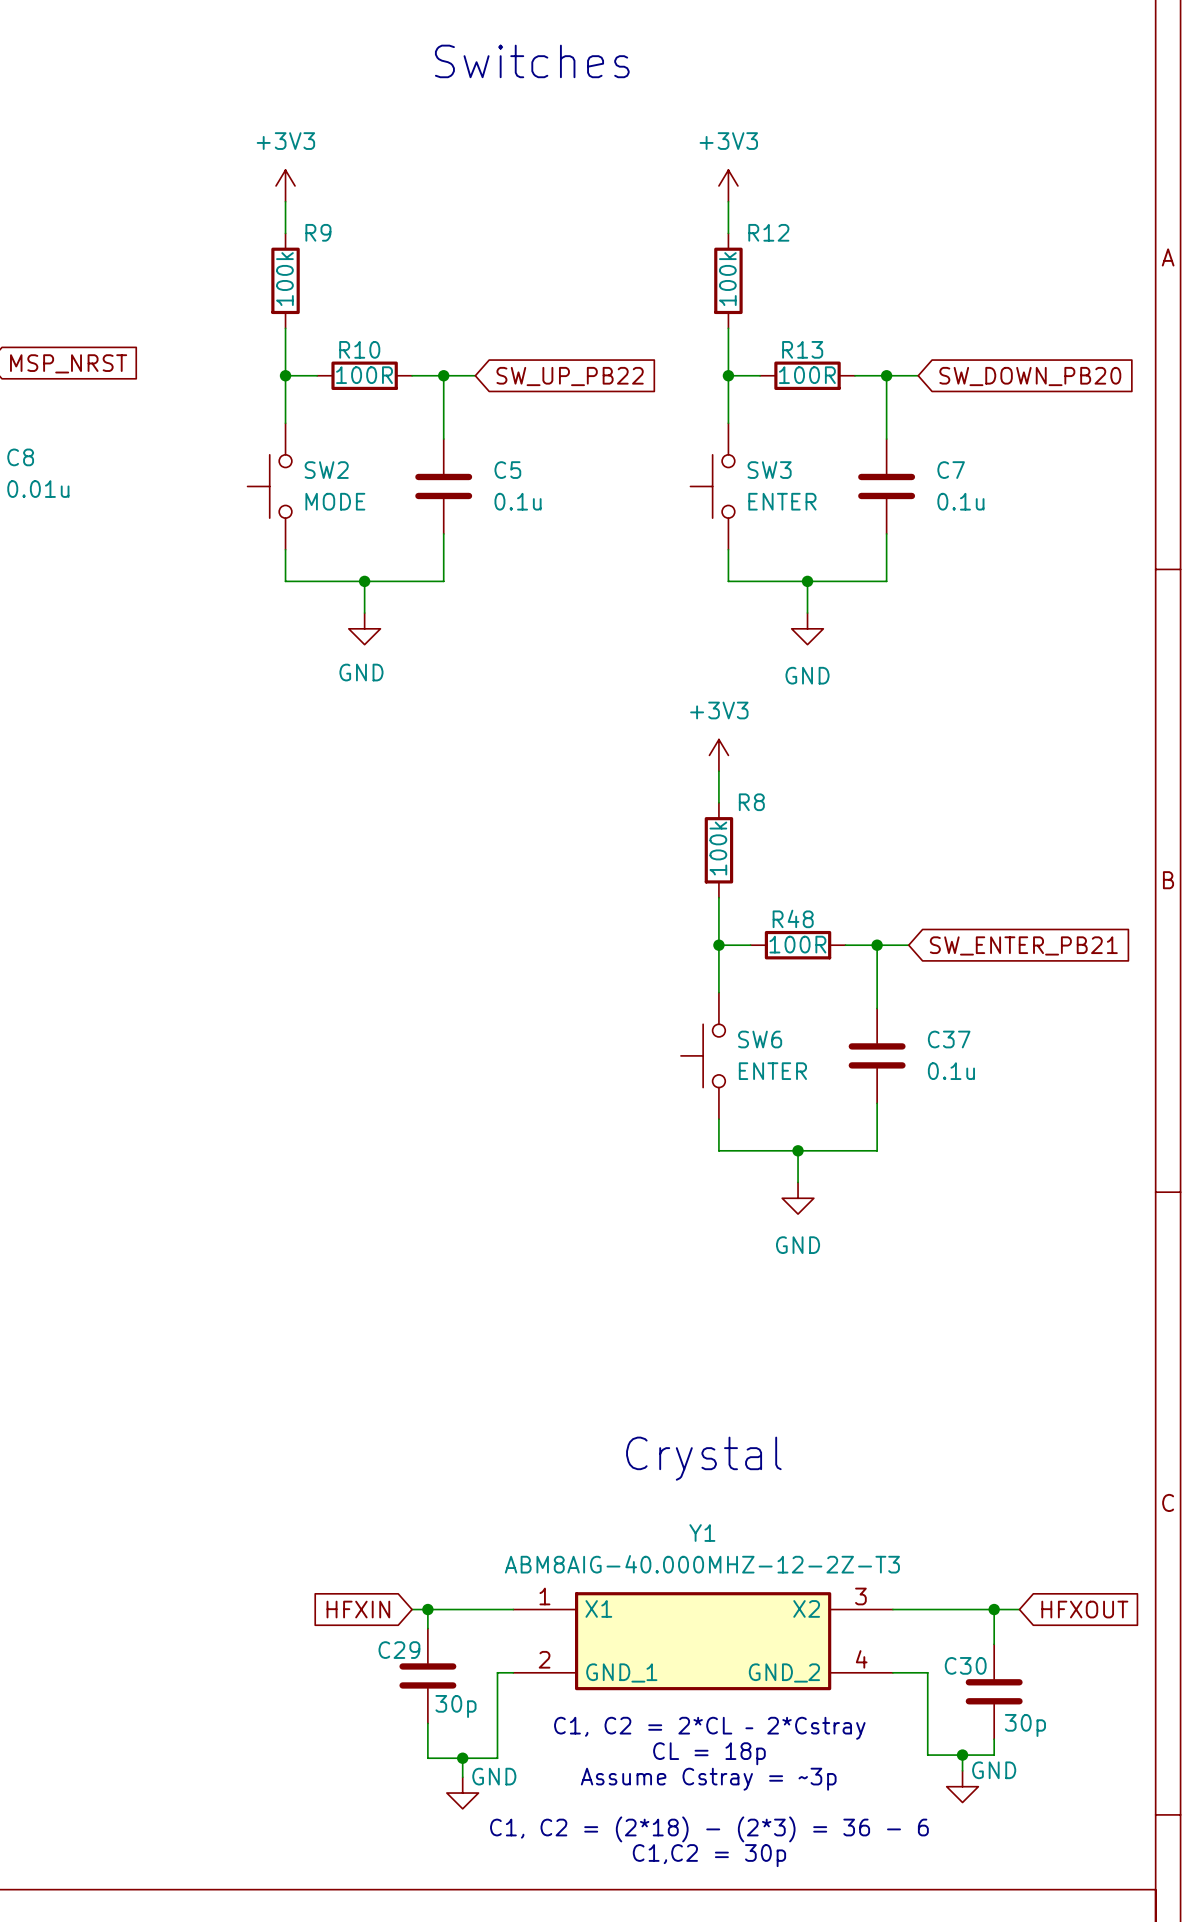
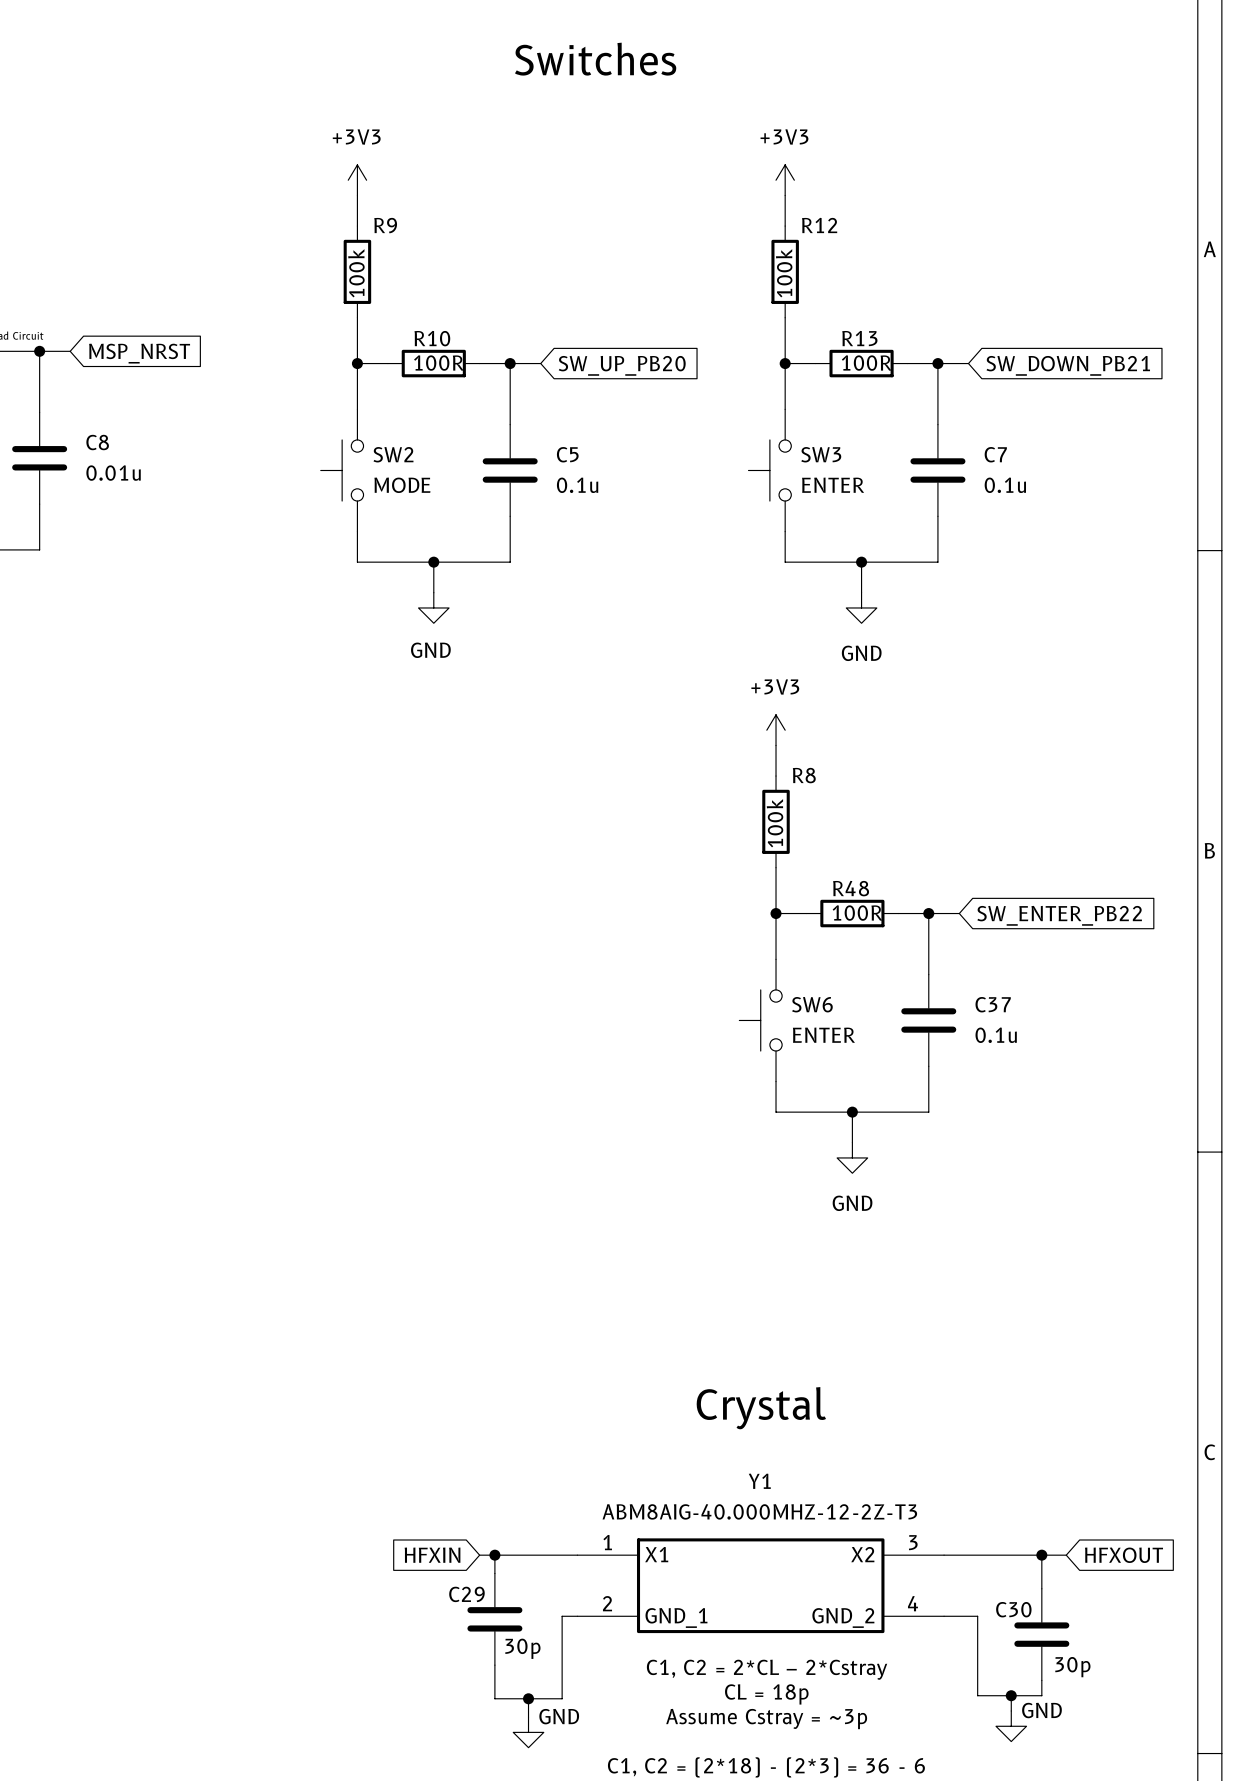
global label: SW_UP_PB22 (570, 376) -> SW_UP_PB20 (622, 365)
global label: SW_DOWN_PB20 (1030, 376) -> SW_DOWN_PB21 (1068, 365)
global label: SW_ENTER_PB21 (1023, 945) -> SW_ENTER_PB22 (1059, 915)

